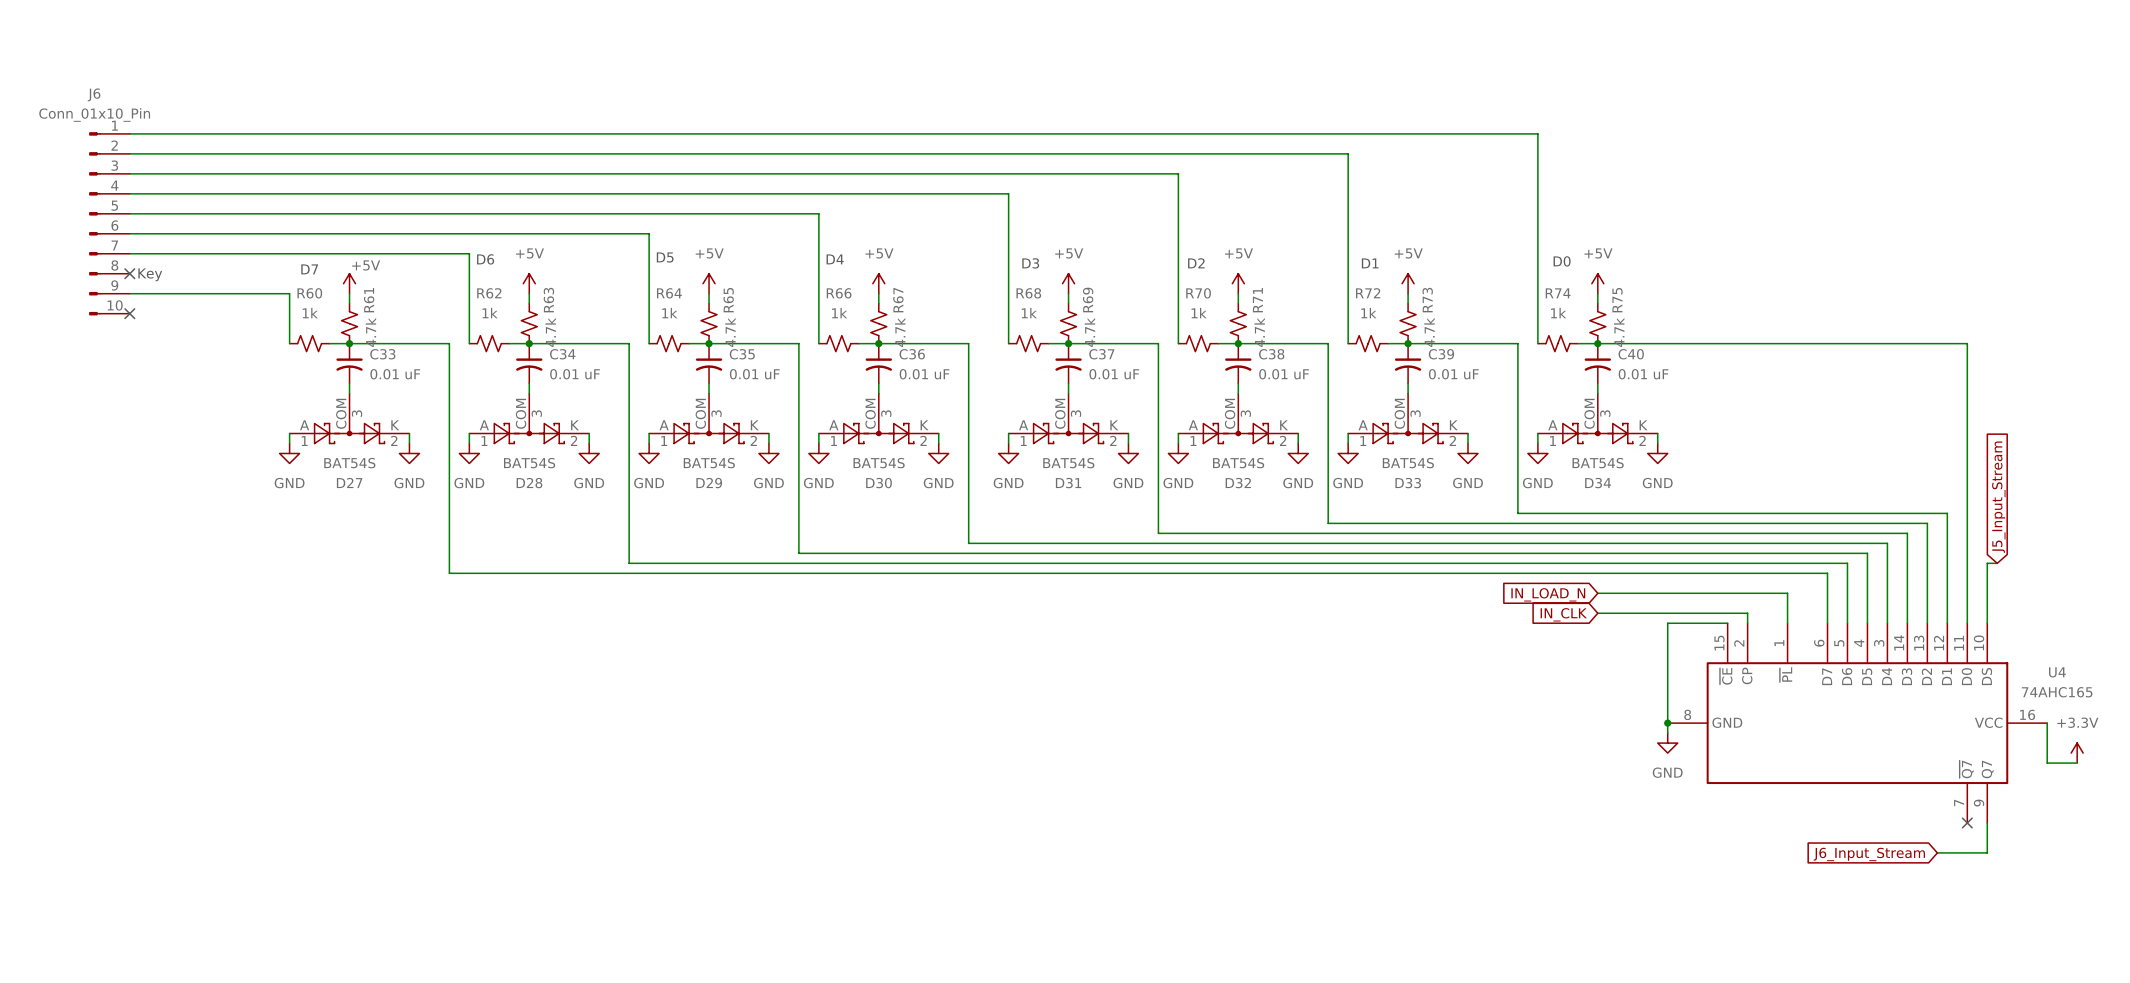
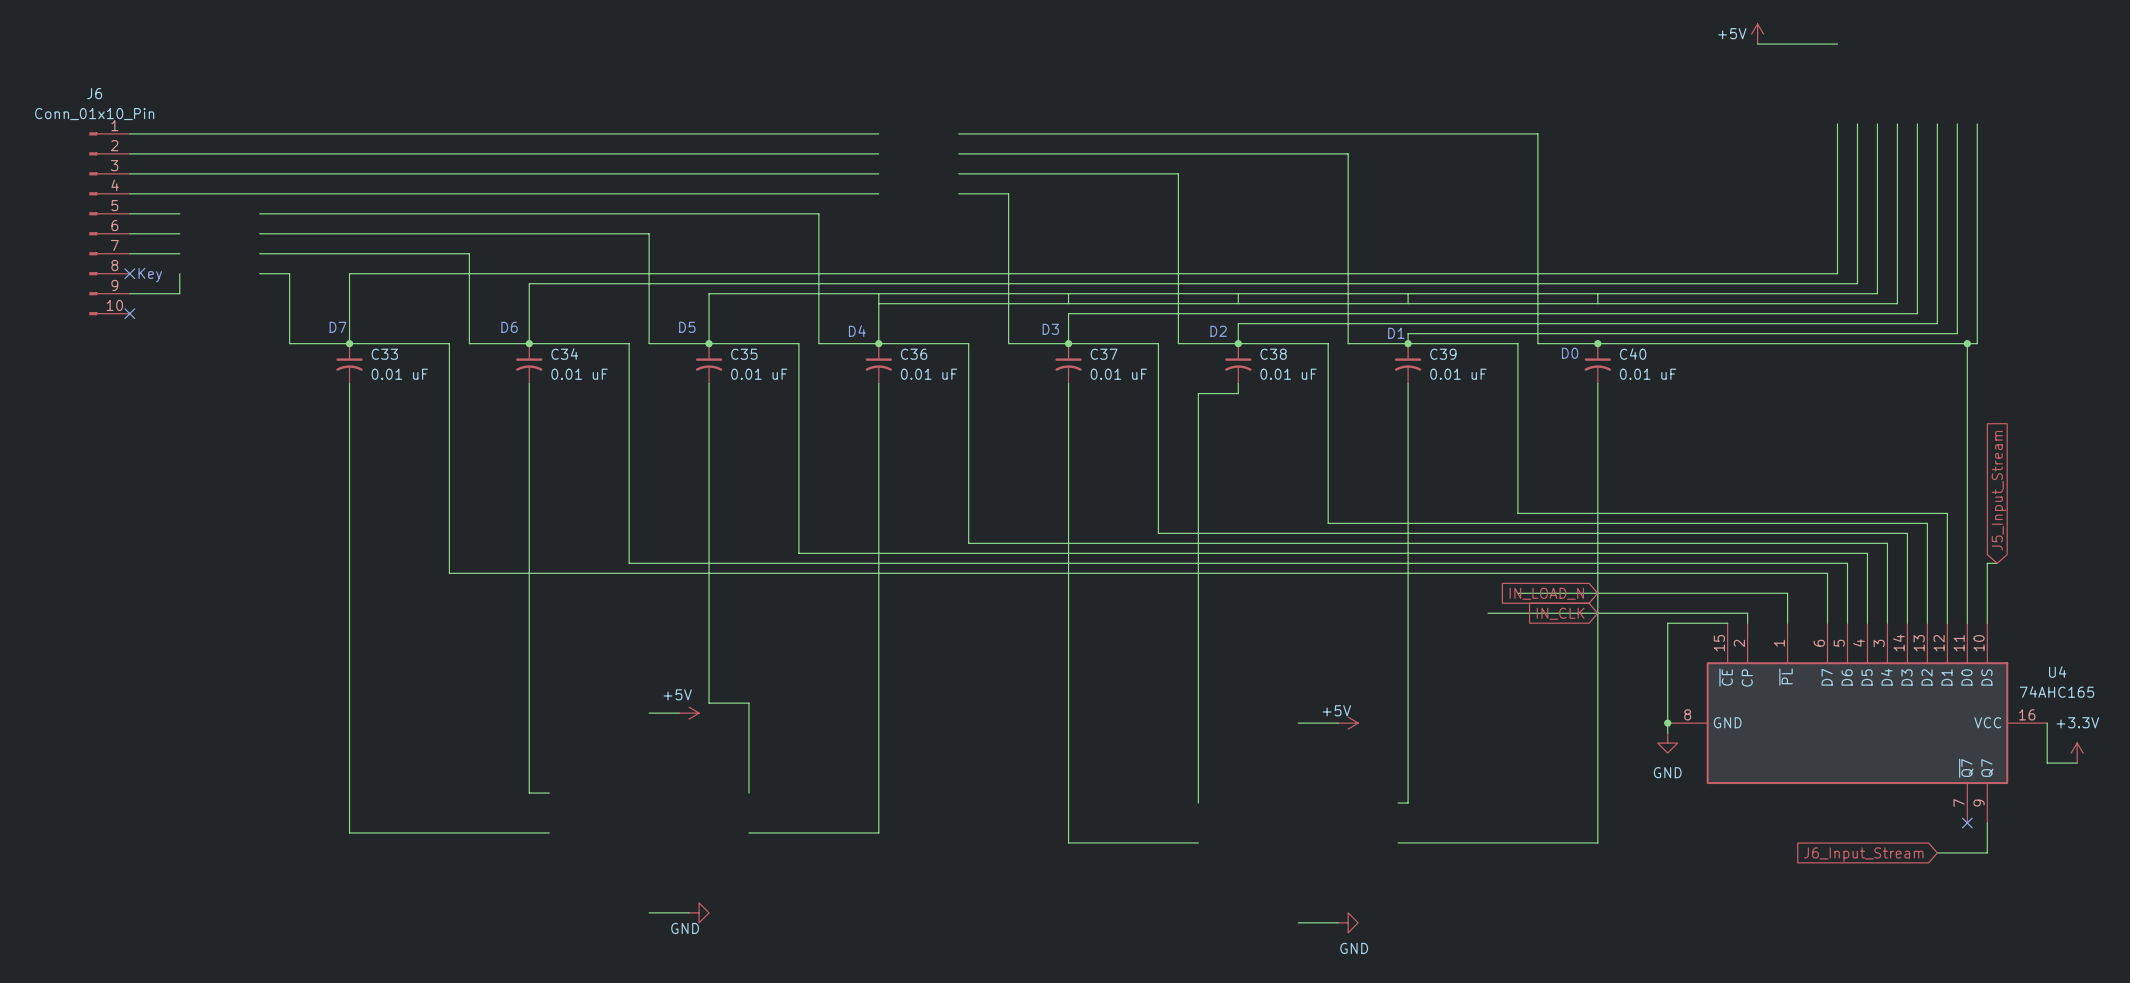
power symbol: none -> +5V (1757, 34)
wire: none -> (1757, 44) (1837, 44)
wire: none -> (1837, 123) (1837, 273) (349, 273) (349, 293)
wire: none -> (1857, 123) (1857, 283) (529, 283) (529, 293)
wire: none -> (1877, 123) (1877, 293) (709, 293)
wire: none -> (1897, 123) (1897, 303) (878, 303) (878, 343)
wire: none -> (1917, 123) (1917, 313) (1068, 313) (1068, 343)
wire: none -> (1937, 123) (1937, 323) (1238, 323) (1238, 343)
wire: none -> (1957, 123) (1957, 333) (1408, 333) (1408, 343)
wire: none -> (1977, 123) (1977, 343) (1967, 343)
wire: (878, 133) (958, 133) -> none
wire: (878, 153) (958, 153) -> none
wire: (878, 173) (958, 173) -> none
wire: (878, 193) (958, 193) -> none
wire: (179, 213) (259, 213) -> none
wire: (179, 233) (259, 233) -> none
wire: (179, 253) (259, 253) -> none
text position: D5 (665, 257) -> D5 (687, 327)
text position: D6 (485, 259) -> D6 (509, 327)
text position: D4 (835, 259) -> D4 (857, 331)
text position: D0 (1562, 261) -> D0 (1570, 353)
text position: D3 (1030, 263) -> D3 (1050, 329)
text position: D2 (1196, 263) -> D2 (1218, 331)
text position: D1 (1370, 263) -> D1 (1396, 333)
text position: D7 (309, 269) -> D7 (338, 327)
wire: none -> (179, 273) (179, 293)
power symbol: +5V (349, 283) -> none
power symbol: +5V (529, 283) -> none
power symbol: +5V (709, 283) -> none
power symbol: +5V (878, 283) -> none
power symbol: +5V (1068, 283) -> none
power symbol: +5V (1238, 283) -> none
power symbol: +5V (1408, 283) -> none
power symbol: +5V (1597, 283) -> none
wire: (179, 293) (289, 293) -> (259, 273) (289, 273) (289, 293)
R61: 4.7k (349, 323) -> none
R63: 4.7k (529, 323) -> none
R65: 4.7k (709, 323) -> none
R67: 4.7k (878, 323) -> none
R69: 4.7k (1068, 323) -> none
R71: 4.7k (1238, 323) -> none
R73: 4.7k (1408, 323) -> none
R75: 4.7k (1597, 323) -> none
R60: 1k (309, 343) -> none
R62: 1k (489, 343) -> none
R64: 1k (669, 343) -> none
R66: 1k (838, 343) -> none
R68: 1k (1028, 343) -> none
R70: 1k (1198, 343) -> none
R72: 1k (1368, 343) -> none
R74: 1k (1557, 343) -> none
junction: none -> (1967, 343)
wire: none -> (349, 393) (349, 832) (549, 832)
wire: none -> (529, 393) (529, 793) (549, 793)
wire: none -> (709, 393) (709, 703) (748, 703) (748, 793)
wire: none -> (878, 393) (878, 832) (748, 832)
wire: none -> (1068, 393) (1068, 842) (1198, 842)
wire: none -> (1238, 393) (1198, 393) (1198, 803)
wire: none -> (1408, 393) (1408, 803) (1398, 803)
wire: none -> (1597, 393) (1597, 842) (1398, 842)
D27: BAT54S (349, 418) -> none
D28: BAT54S (529, 418) -> none
D29: BAT54S (709, 418) -> none
D30: BAT54S (878, 418) -> none
D31: BAT54S (1068, 418) -> none
D32: BAT54S (1238, 418) -> none
D33: BAT54S (1408, 418) -> none
D34: BAT54S (1597, 418) -> none
wire: (289, 433) (289, 443) -> none
wire: (409, 433) (409, 443) -> none
wire: (469, 433) (469, 443) -> none
wire: (589, 433) (589, 443) -> none
wire: (649, 433) (649, 443) -> none
wire: (768, 433) (768, 443) -> none
wire: (818, 433) (818, 443) -> none
wire: (938, 433) (938, 443) -> none
wire: (1008, 433) (1008, 443) -> none
wire: (1128, 433) (1128, 443) -> none
wire: (1178, 433) (1178, 443) -> none
wire: (1298, 433) (1298, 443) -> none
wire: (1348, 433) (1348, 443) -> none
wire: (1467, 433) (1467, 443) -> none
wire: (1537, 433) (1537, 443) -> none
wire: (1657, 433) (1657, 443) -> none
power symbol: GND (289, 453) -> none
power symbol: GND (409, 453) -> none
power symbol: GND (469, 453) -> none
power symbol: GND (589, 453) -> none
power symbol: GND (649, 453) -> none
power symbol: GND (768, 453) -> none
power symbol: GND (818, 453) -> none
power symbol: GND (938, 453) -> none
power symbol: GND (1008, 453) -> none
power symbol: GND (1128, 453) -> none
power symbol: GND (1178, 453) -> none
power symbol: GND (1298, 453) -> none
power symbol: GND (1348, 453) -> none
power symbol: GND (1467, 453) -> none
power symbol: GND (1537, 453) -> none
power symbol: GND (1657, 453) -> none
wire: none -> (1517, 593) (1597, 593)
wire: none -> (1487, 613) (1597, 613)
wire: none -> (649, 713) (679, 713)
power symbol: none -> +5V (689, 713)
wire: none -> (1298, 723) (1338, 723)
power symbol: none -> +5V (1348, 723)
wire: none -> (649, 912) (689, 912)
power symbol: none -> GND (699, 912)
wire: none -> (1298, 922) (1338, 922)
power symbol: none -> GND (1348, 922)

